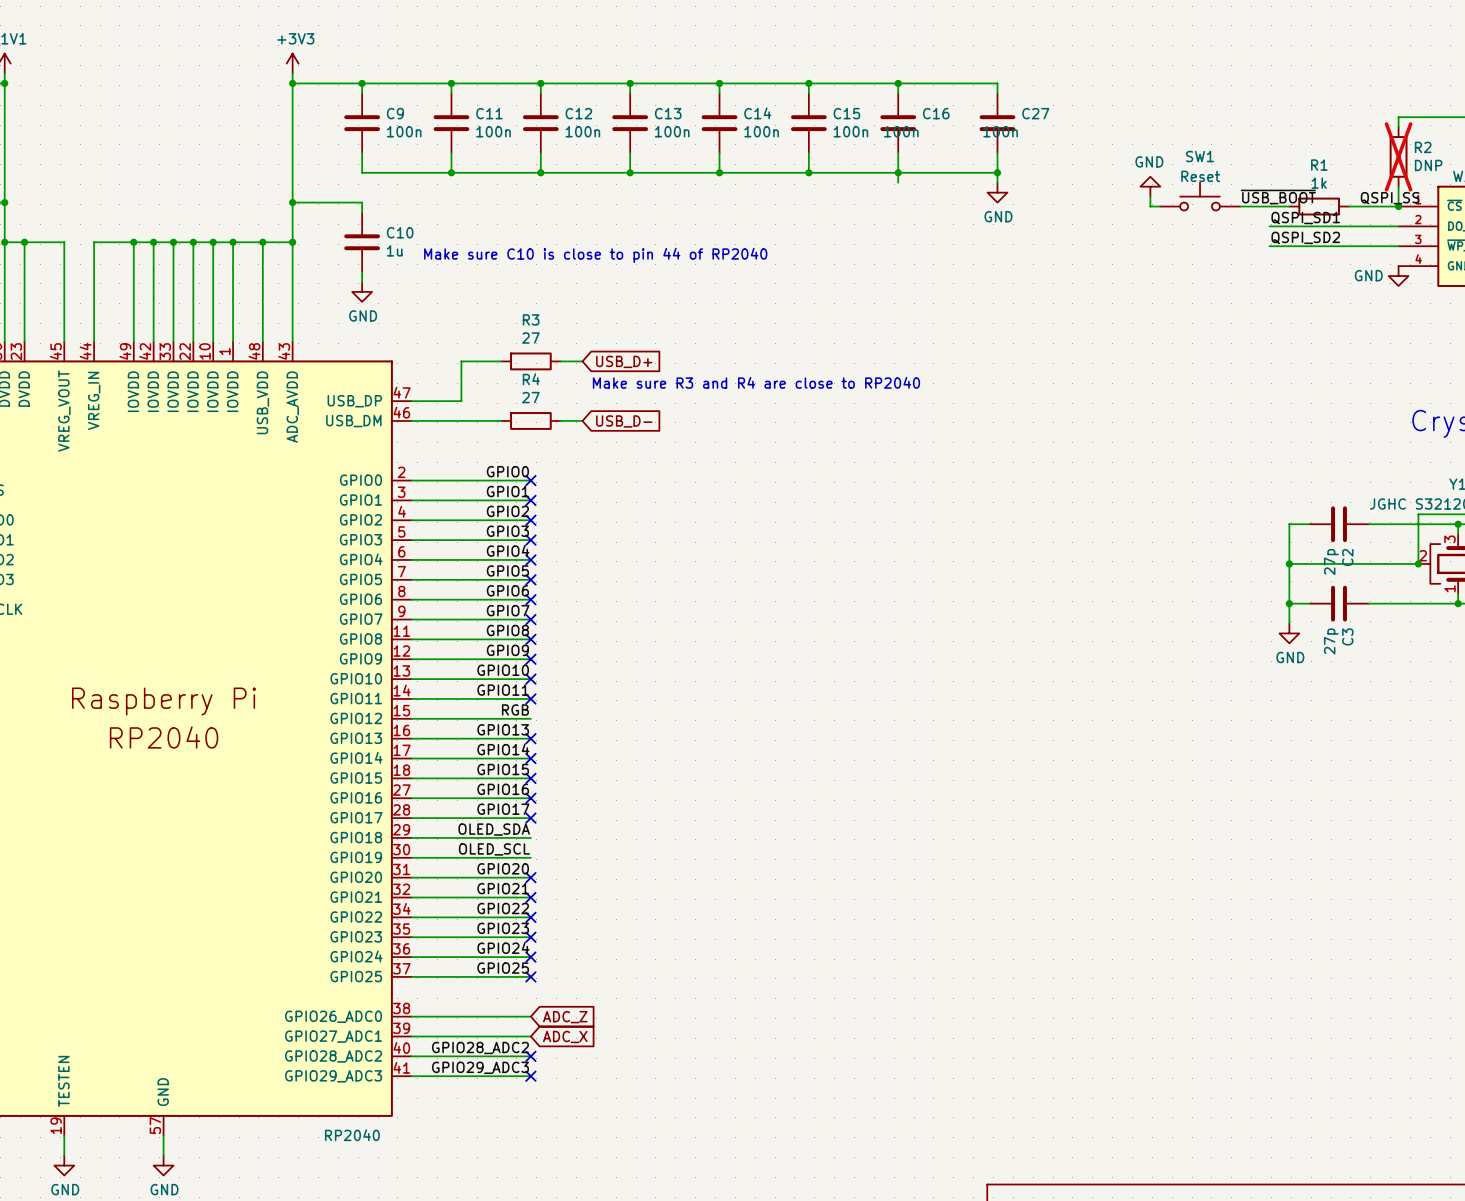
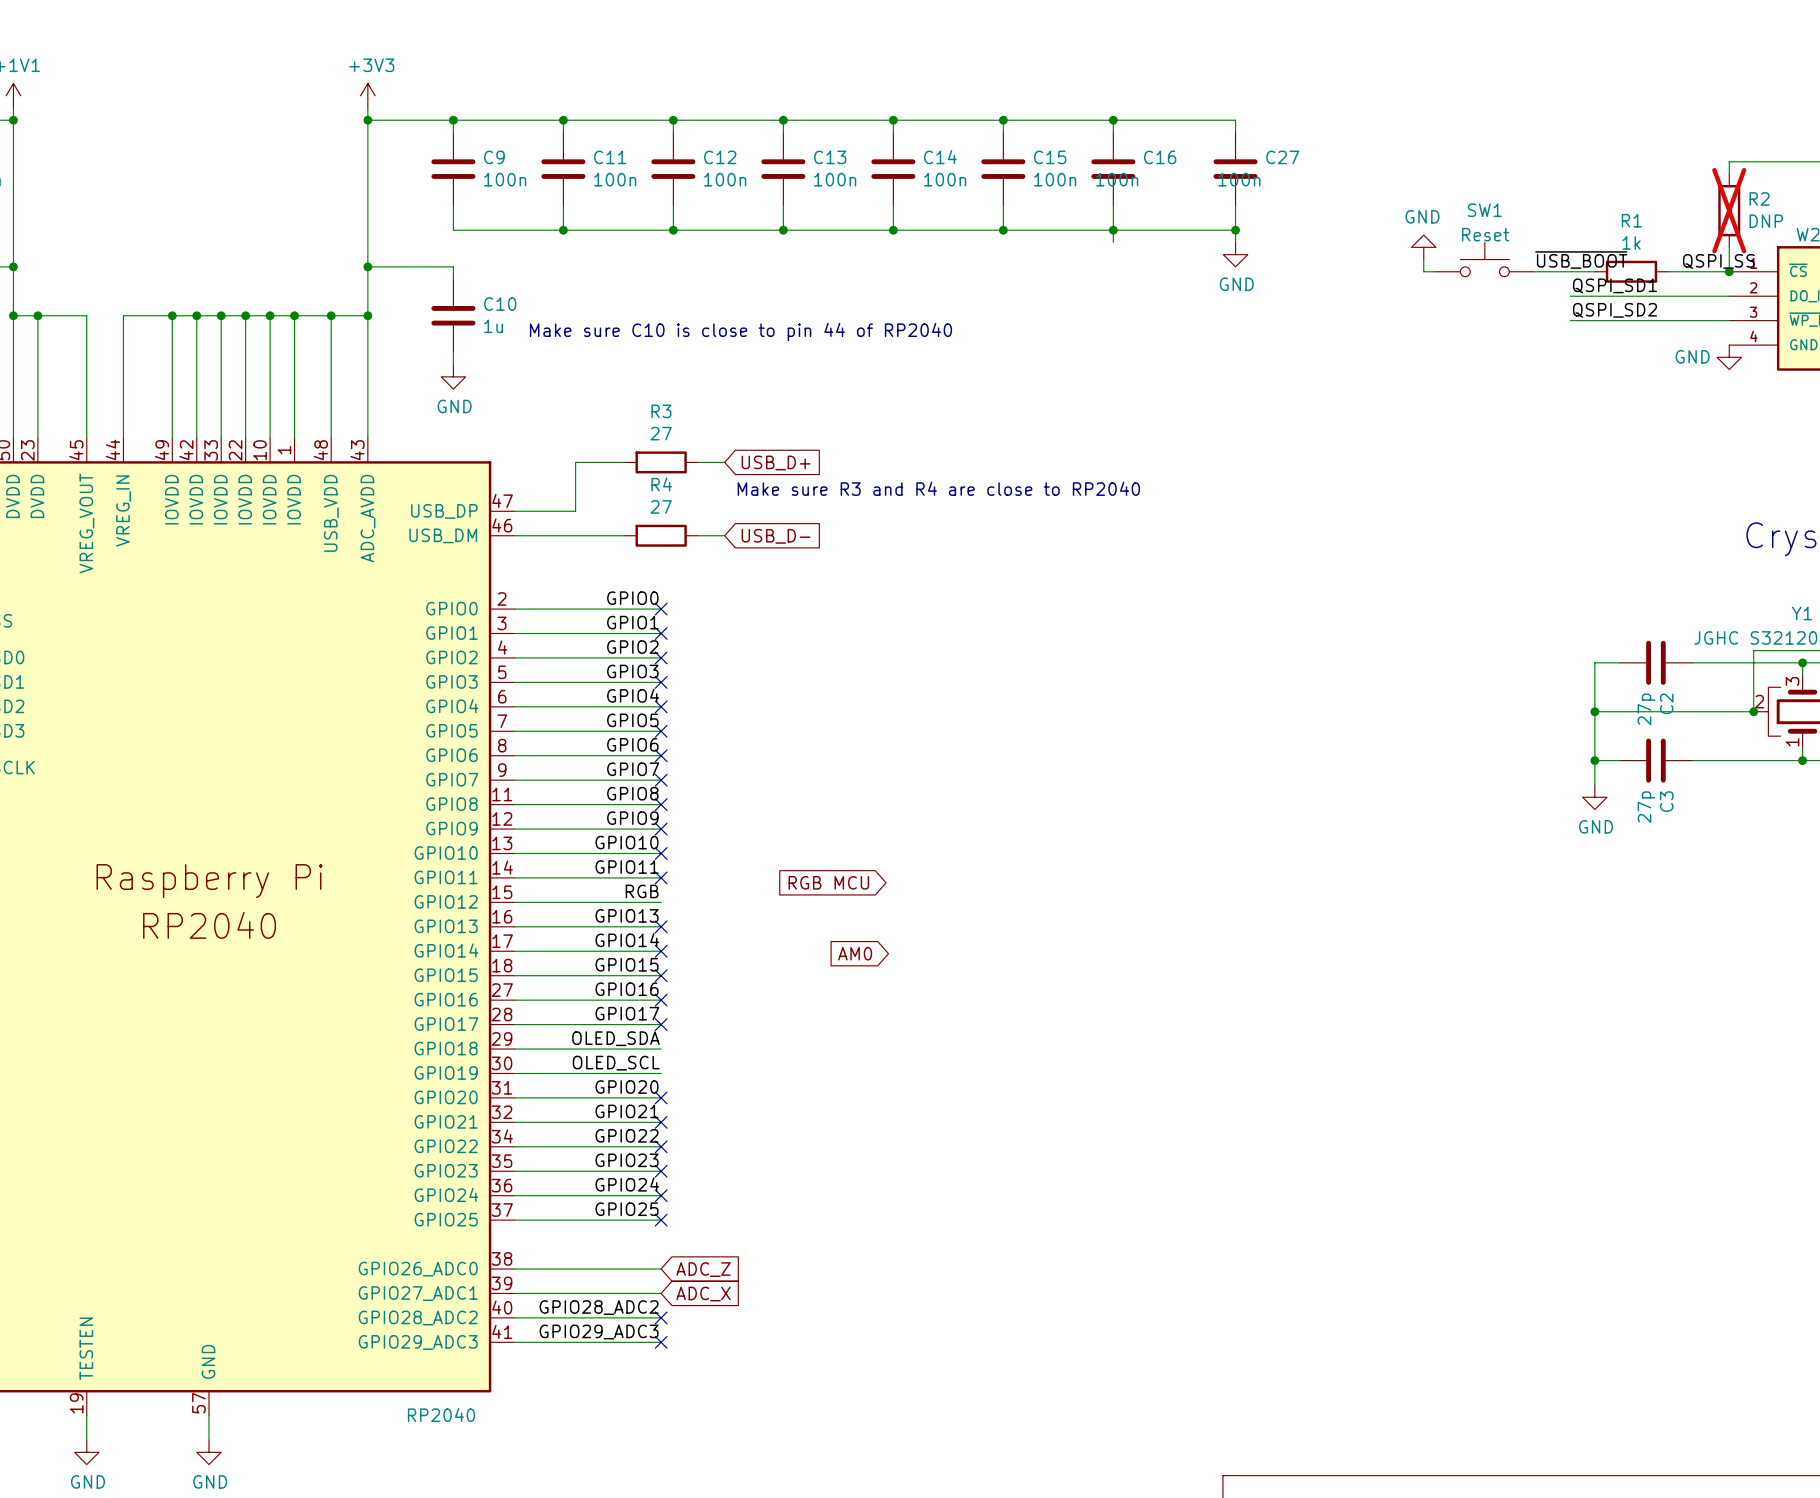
global label: none -> RGB MCU (828, 882)
global label: none -> AM0 (855, 953)

